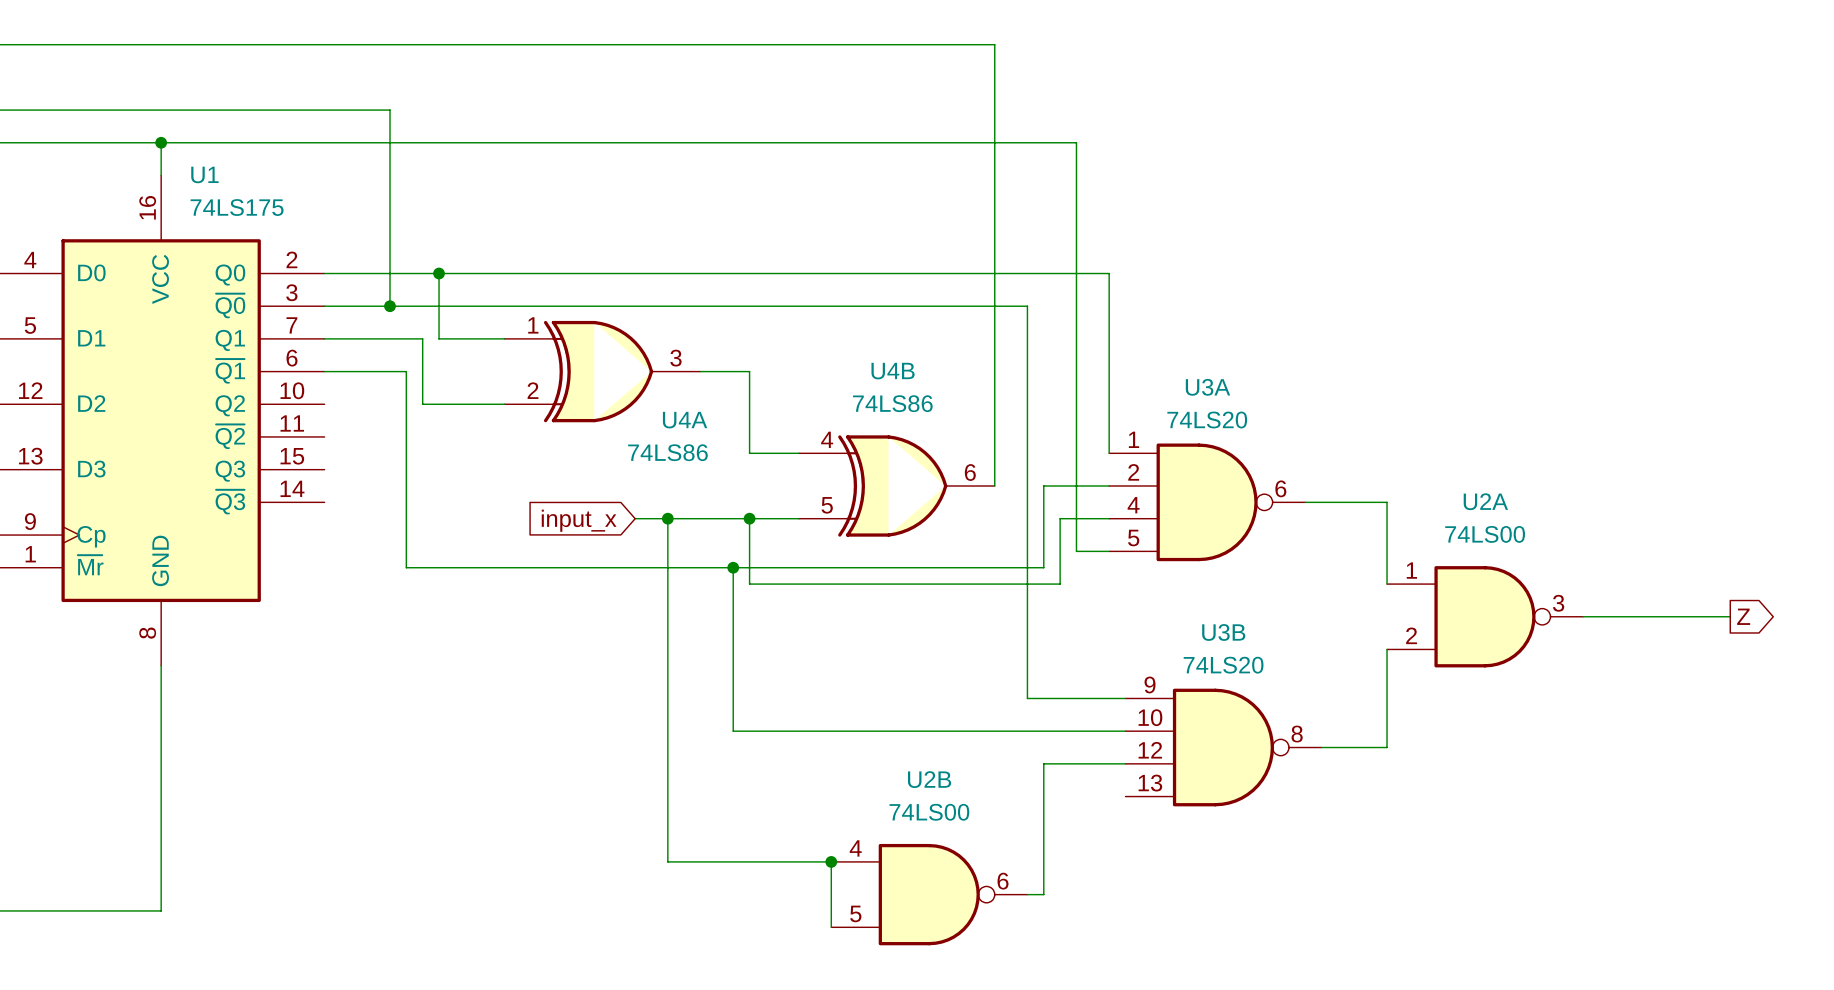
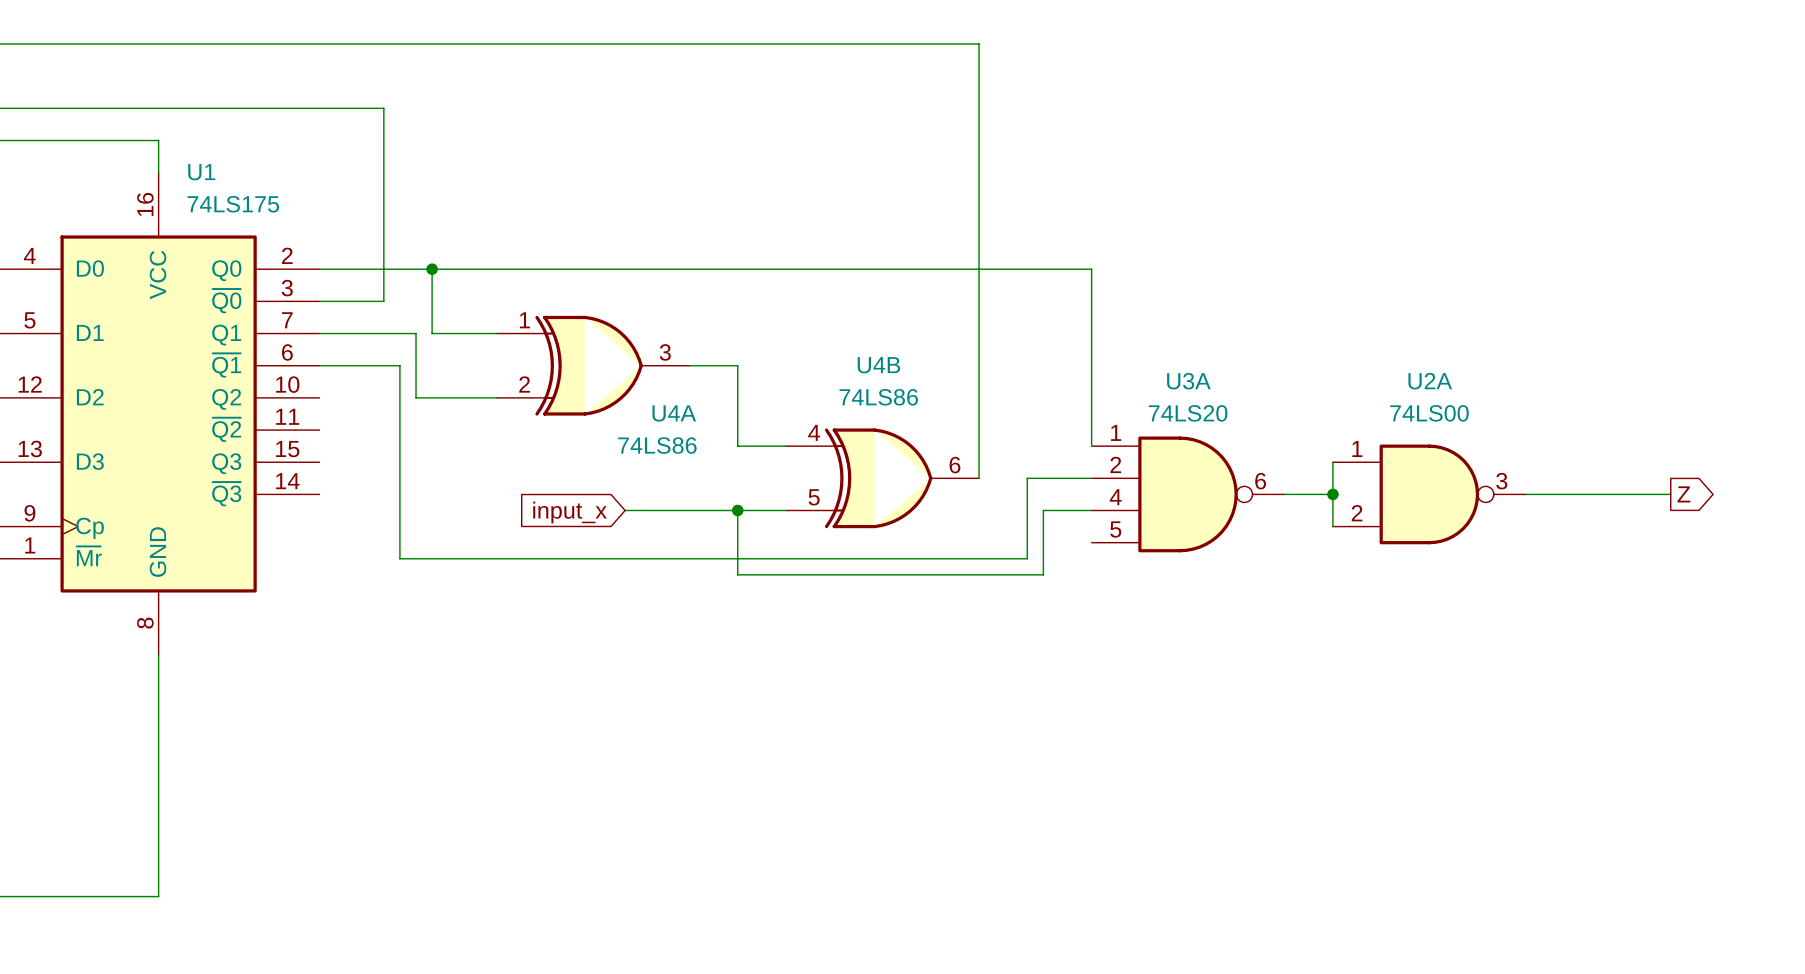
wire: (161, 142) (1076, 142) (1076, 551) (1109, 551) -> none
junction: (161, 142) -> none
wire: (389, 306) (1027, 306) (1027, 698) (1125, 698) -> none
junction: (389, 306) -> none
wire: none -> (1332, 462) (1332, 526)
wire: (1354, 502) (1387, 502) (1387, 584) -> none
junction: none -> (1332, 494)
wire: (667, 518) (667, 861) (831, 861) (831, 927) -> none
junction: (667, 518) -> none
wire: (733, 567) (733, 731) (1125, 731) -> none
junction: (733, 567) -> none
U2A position: (1485, 616) -> (1429, 494)
wire: (1583, 616) (1730, 616) -> (1525, 494) (1670, 494)
global label position: Z (1743, 616) -> Z (1683, 494)
wire: (1387, 649) (1387, 747) (1321, 747) -> none
U3B: 74LS20 (1223, 747) -> none
wire: (1125, 763) (1043, 763) (1043, 894) (1027, 894) -> none
junction: (831, 861) -> none
U2B: 74LS00 (929, 894) -> none

